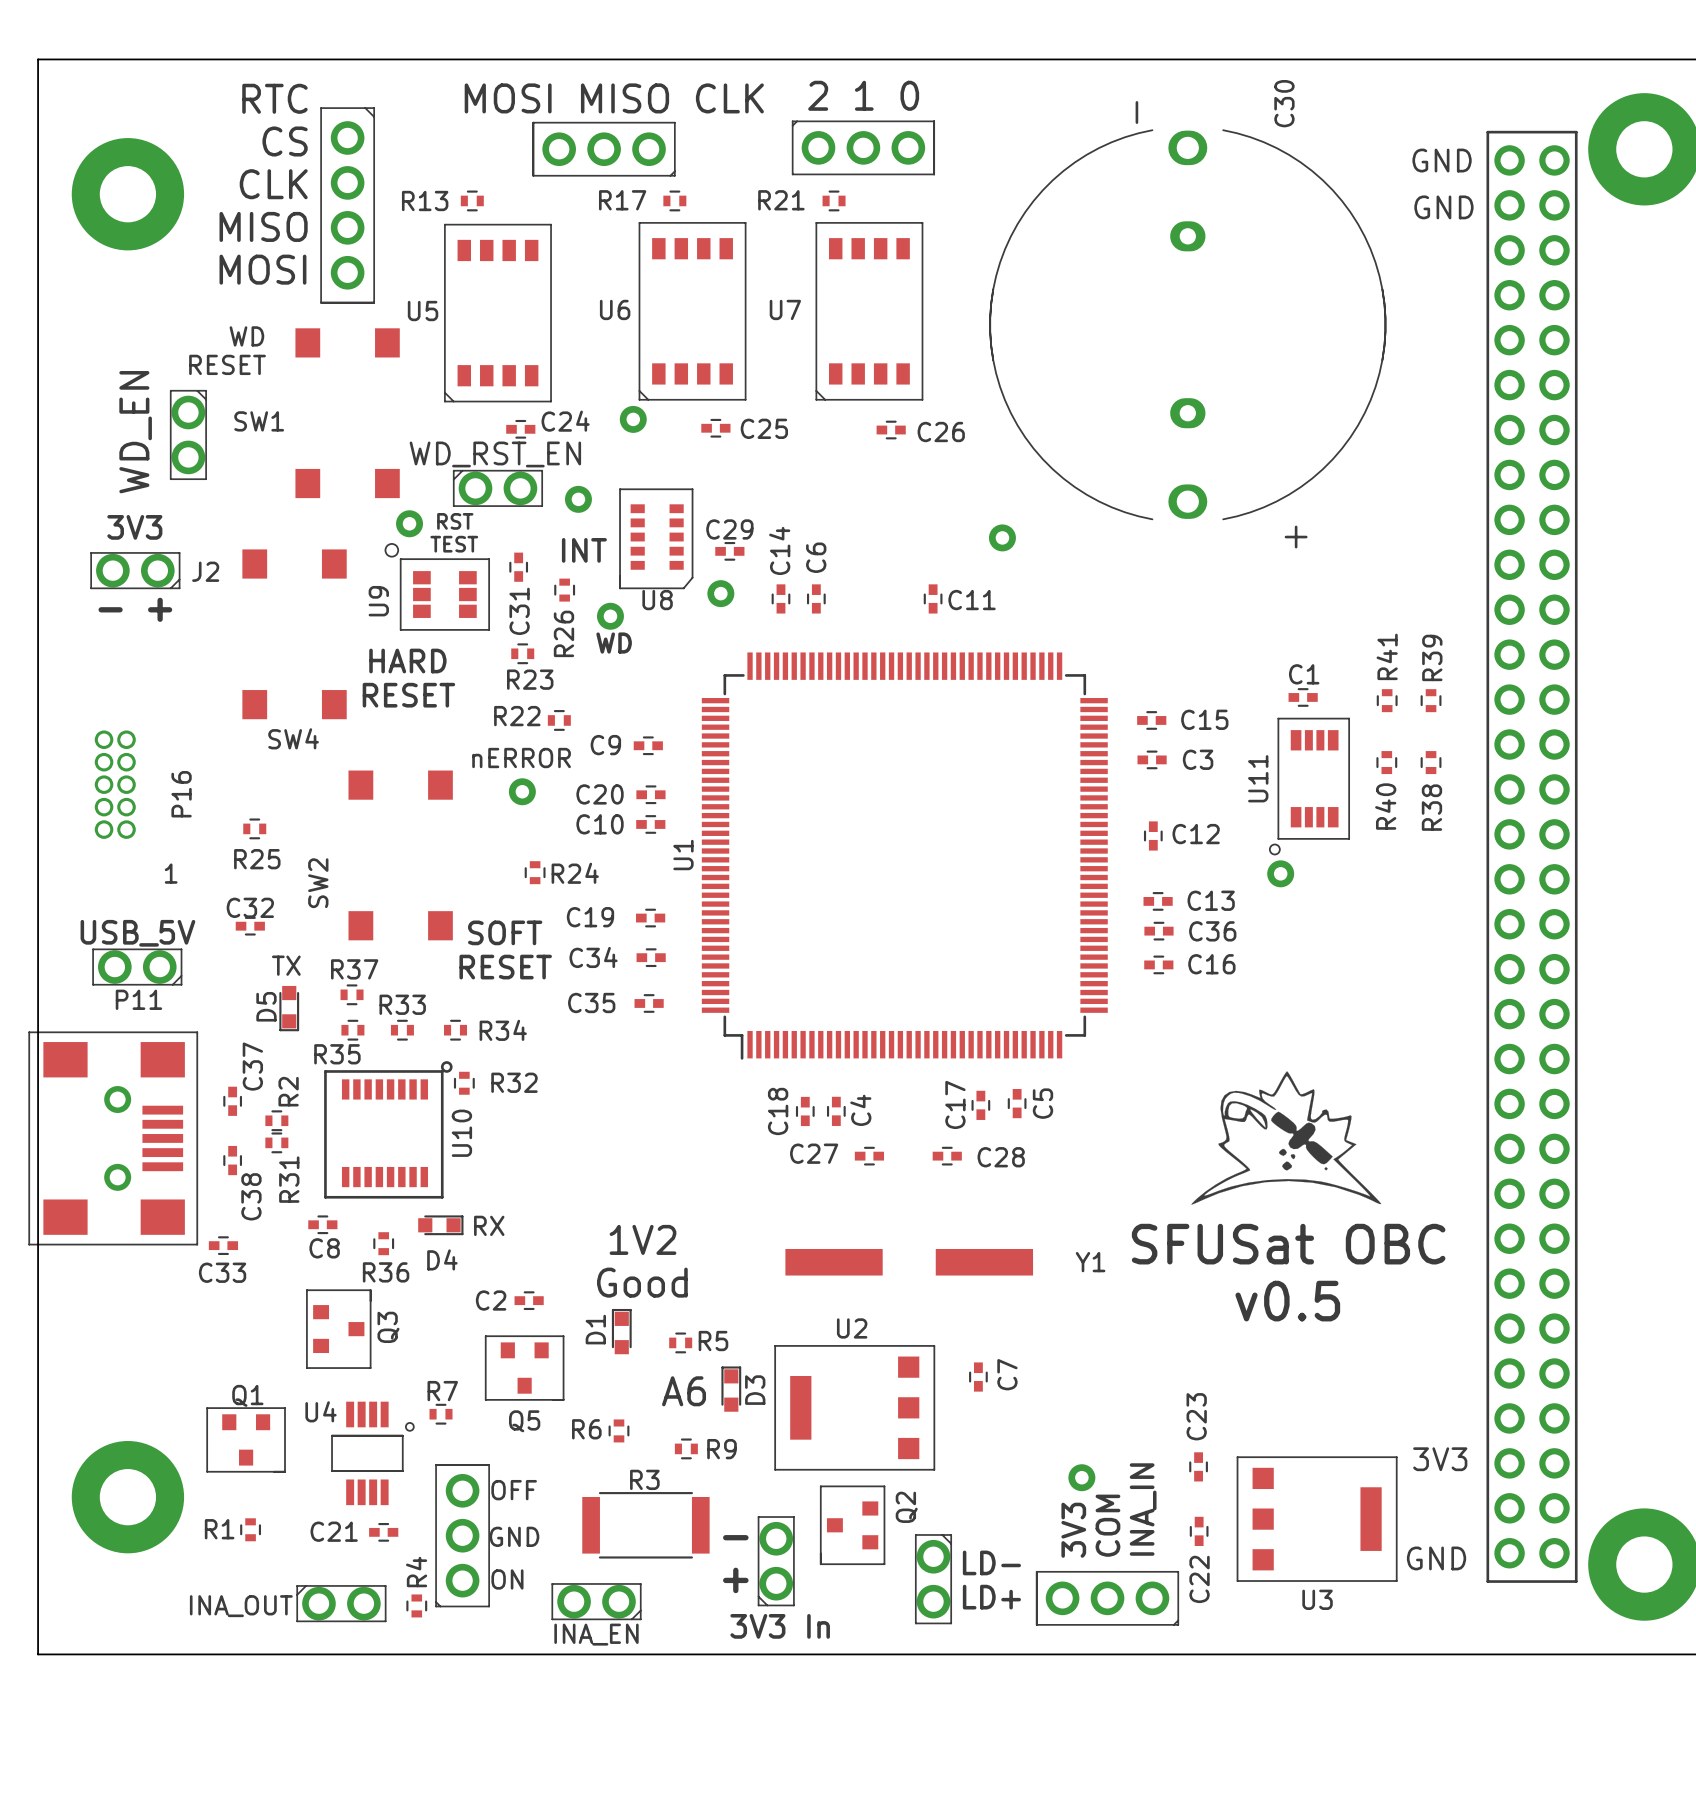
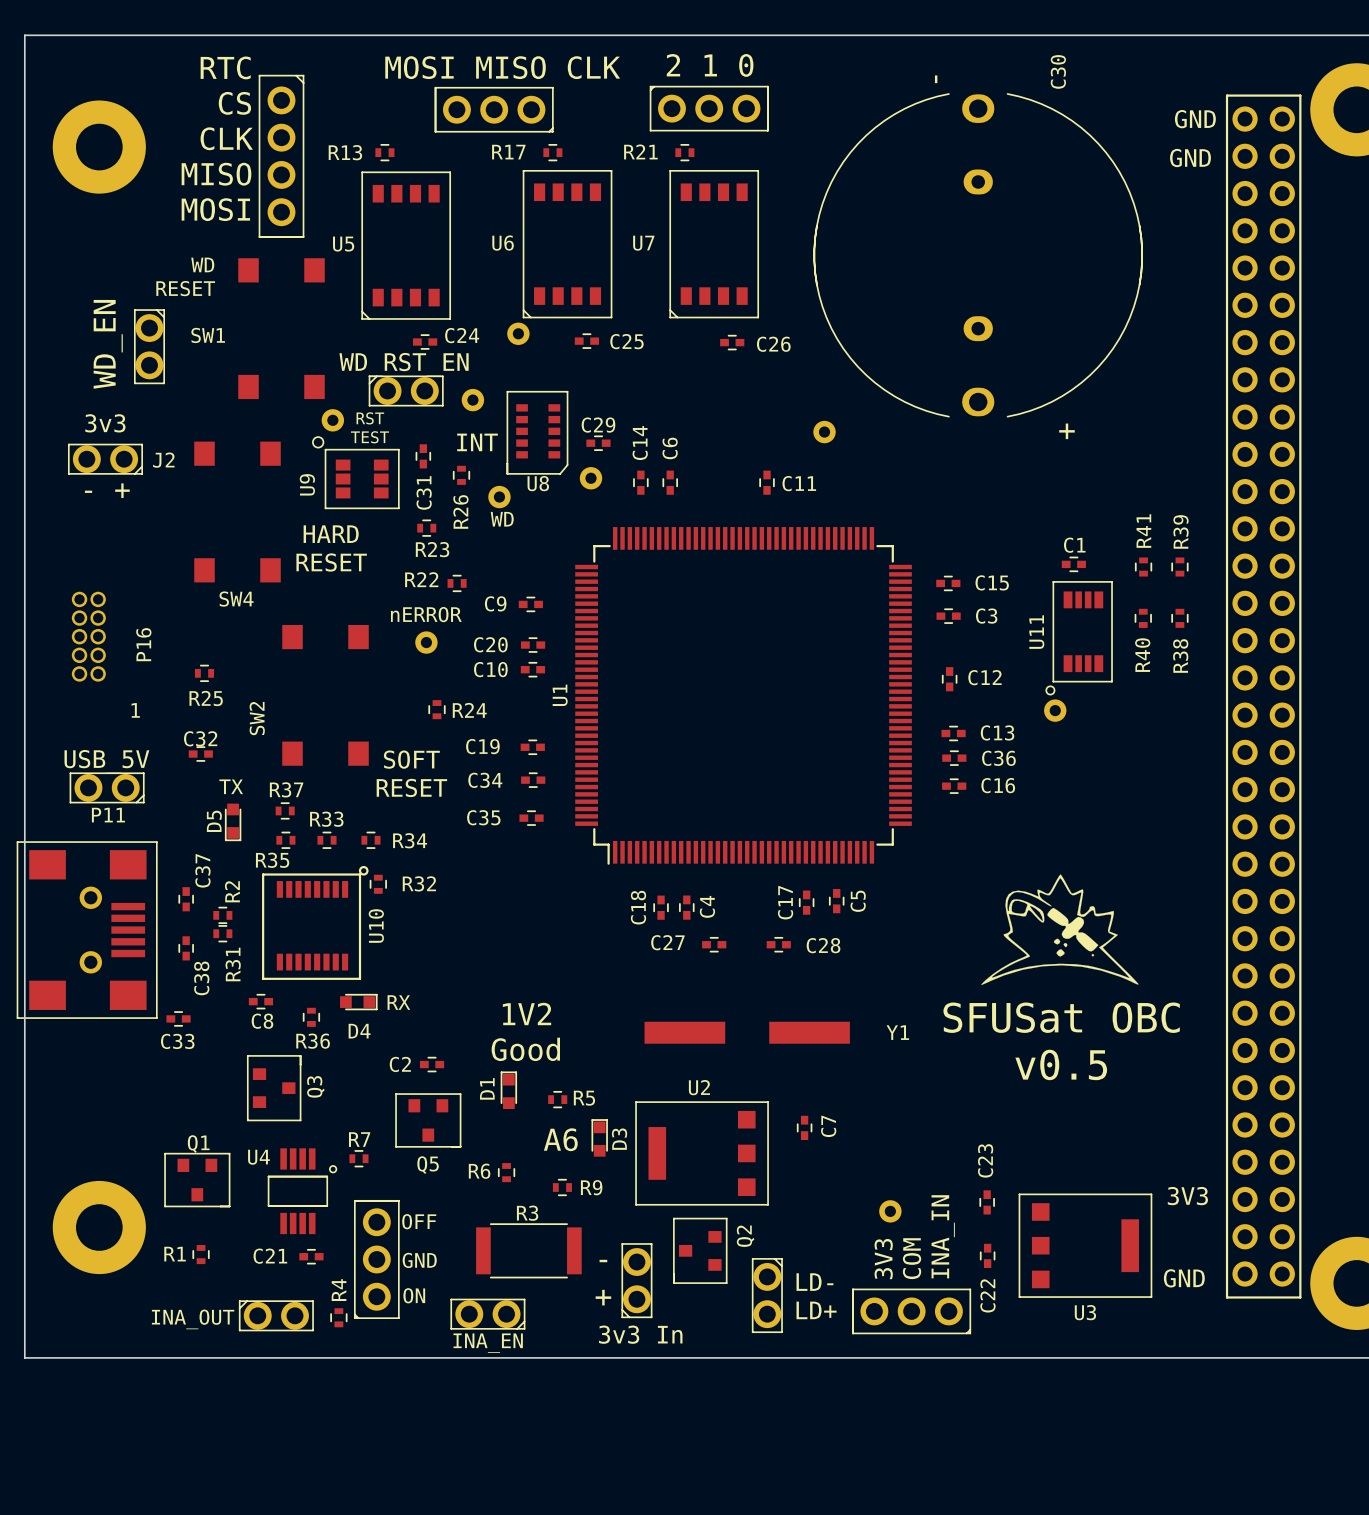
text: 3V3 (134, 527) -> 3v3 (105, 423)
text: 3V3 In (780, 1626) -> 3v3 In (640, 1334)

